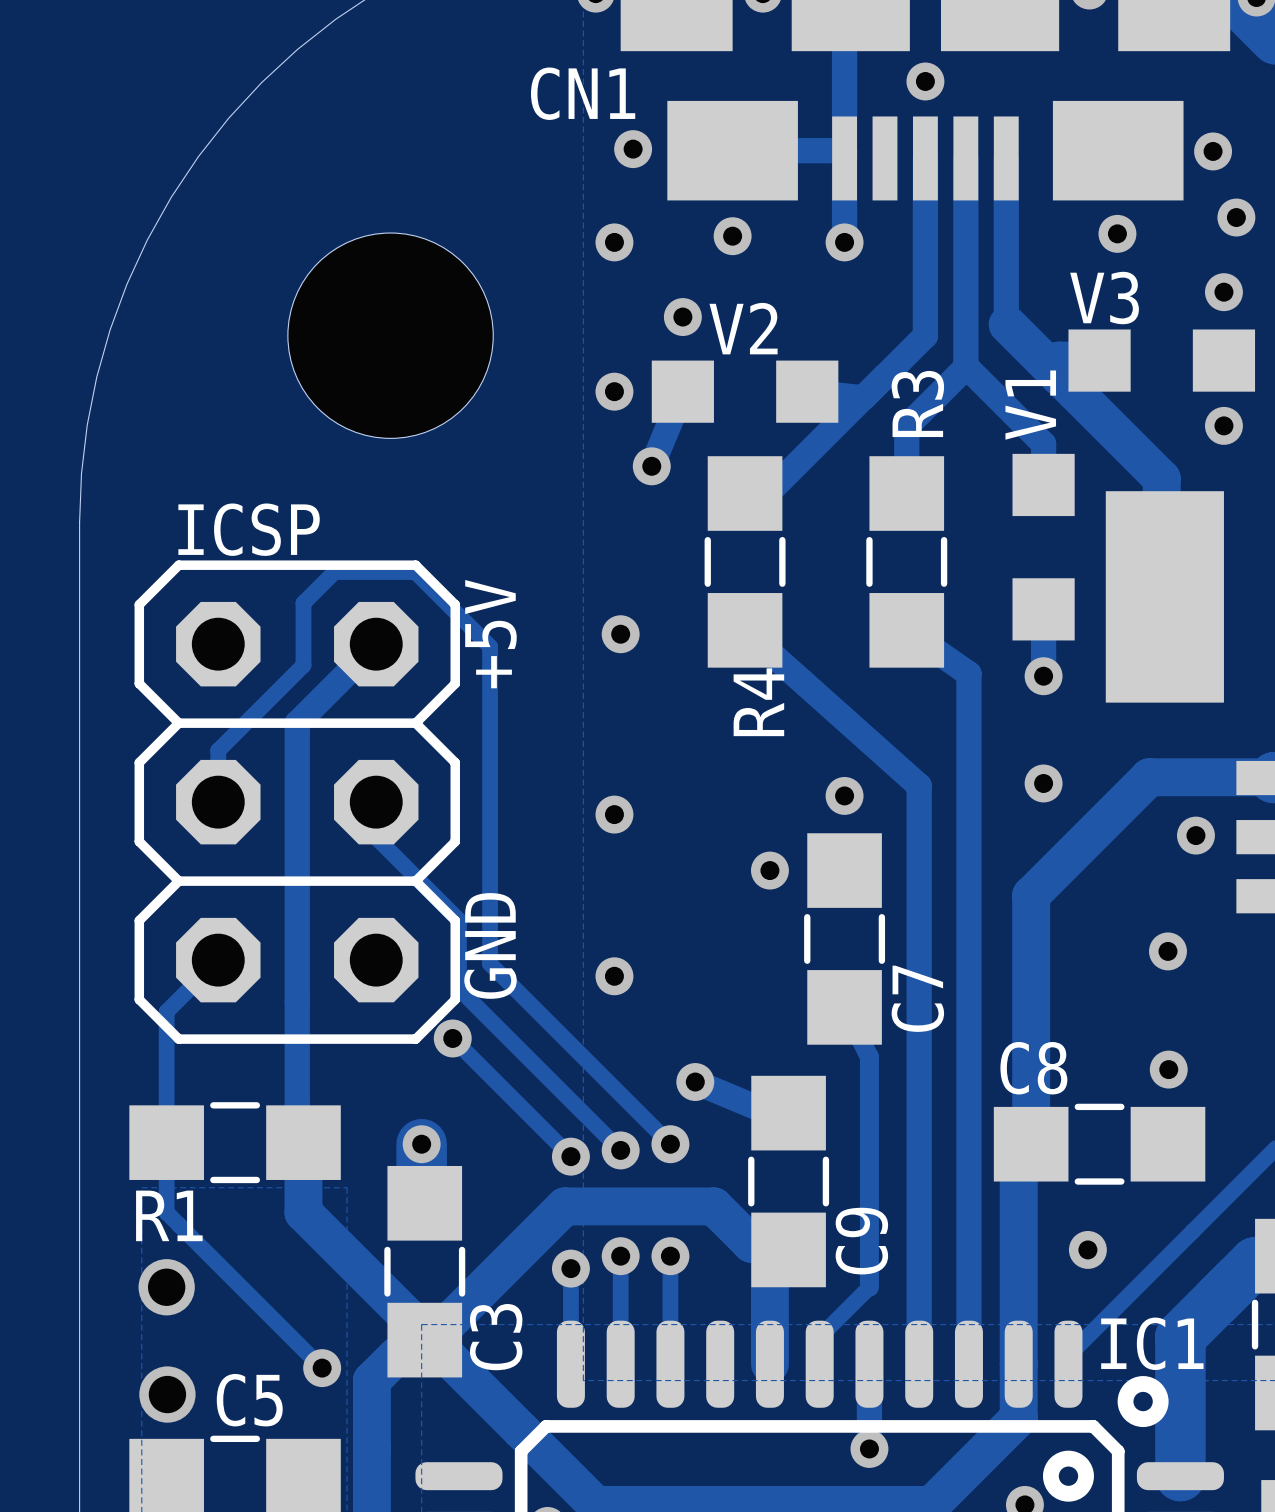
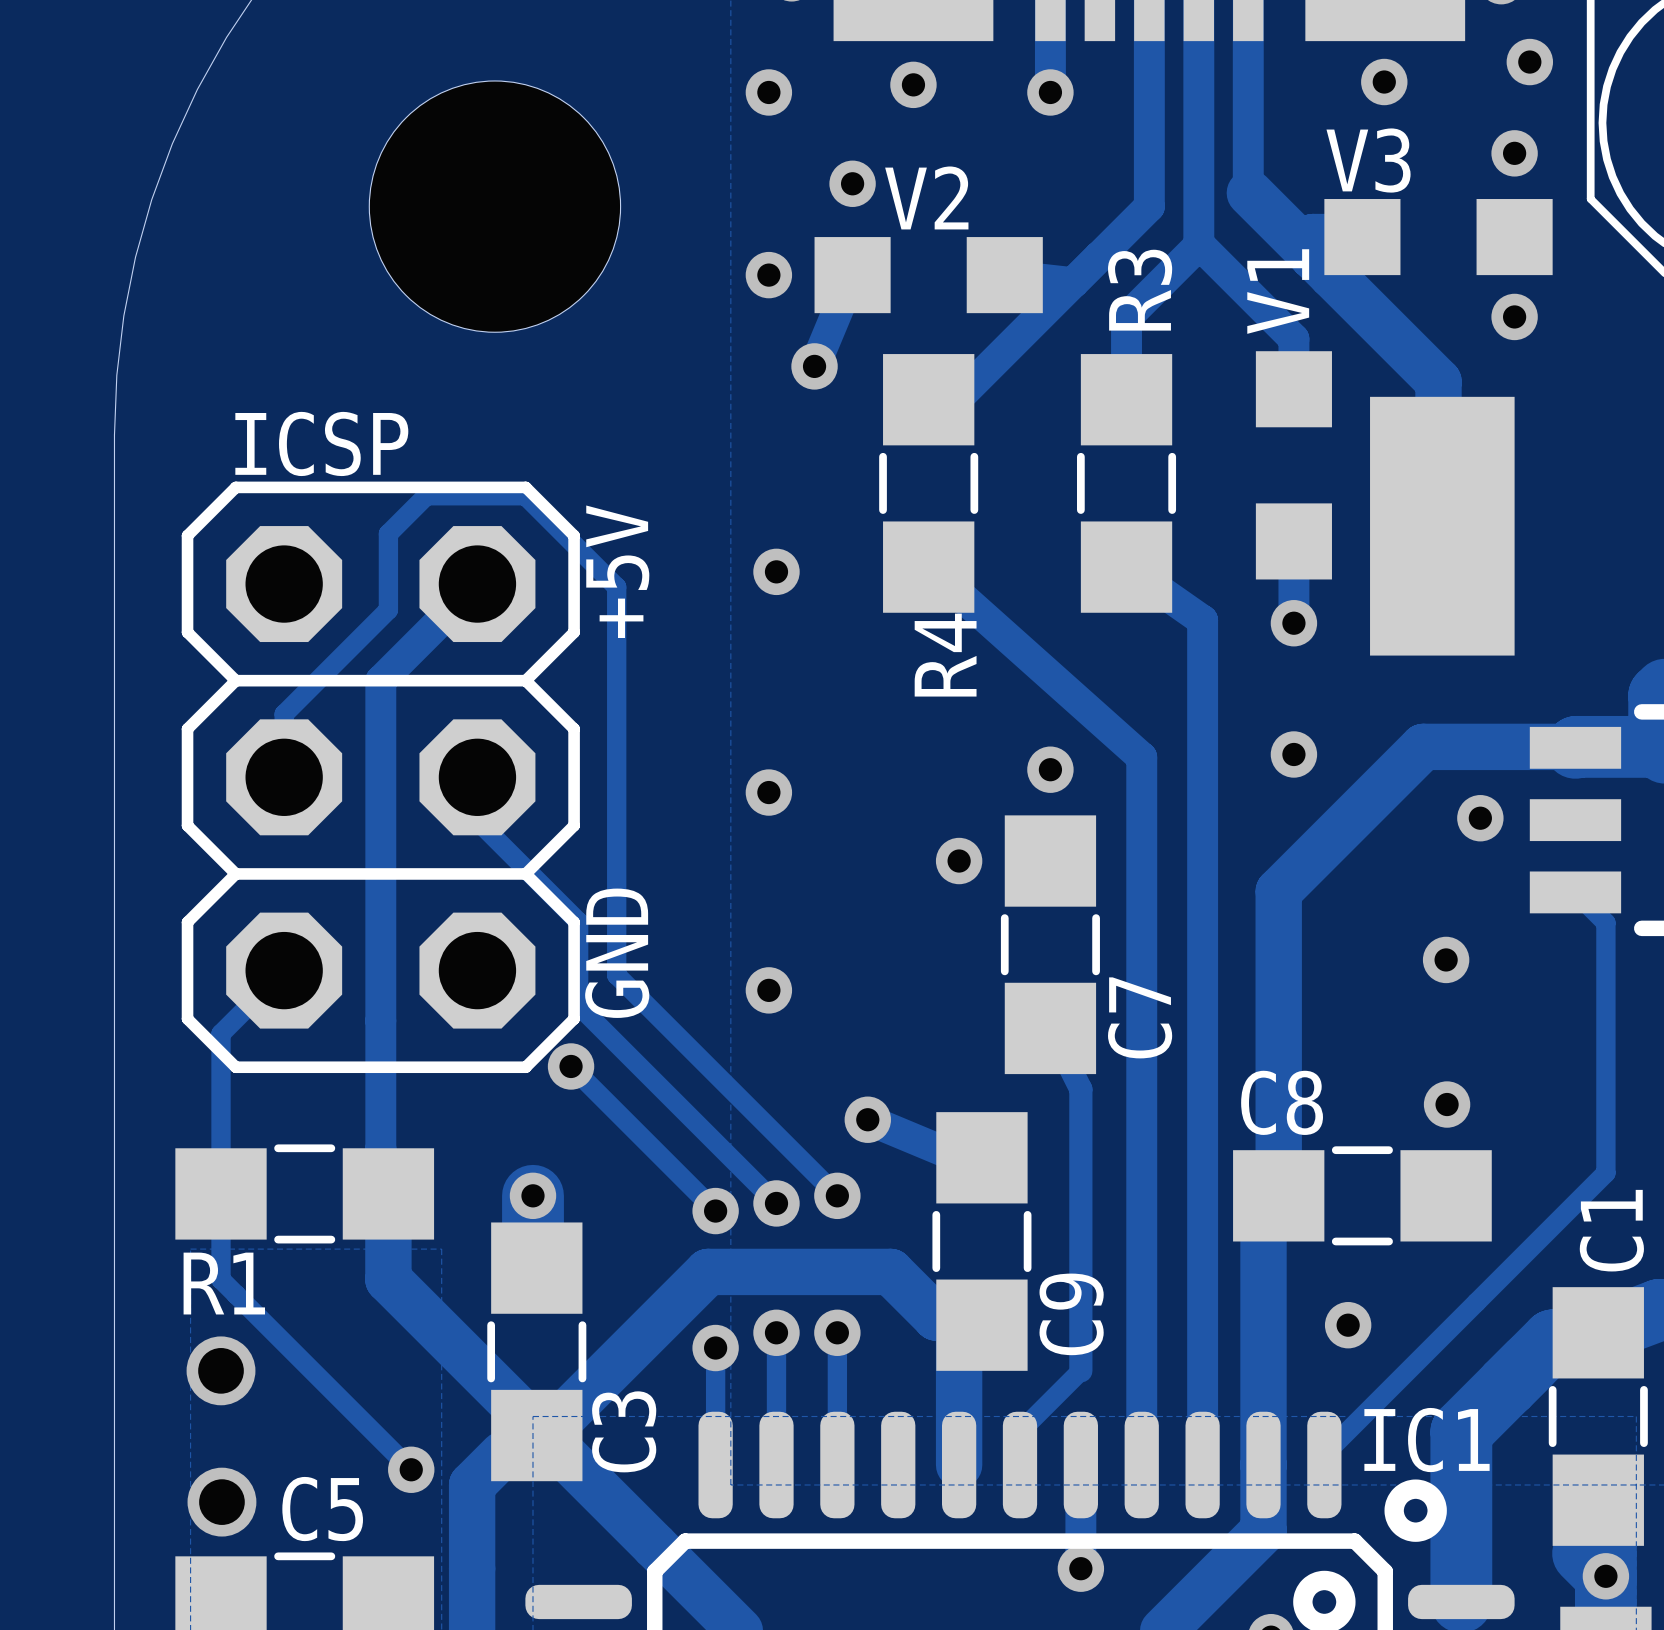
ICSP footprint: [134, 560, 460, 1044] -> [181, 481, 580, 1074]

